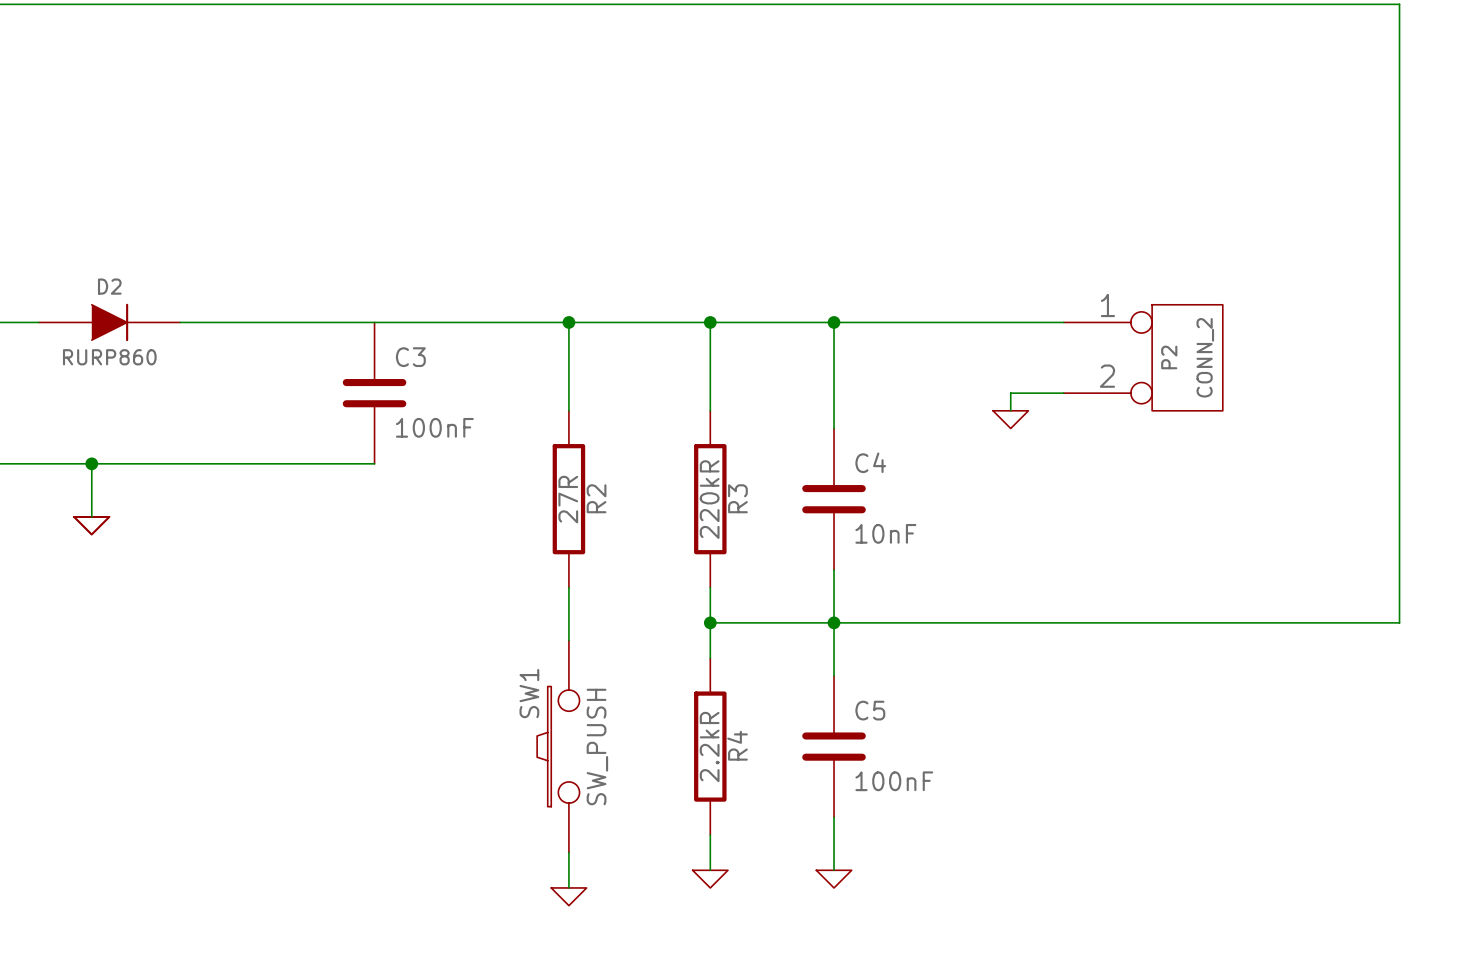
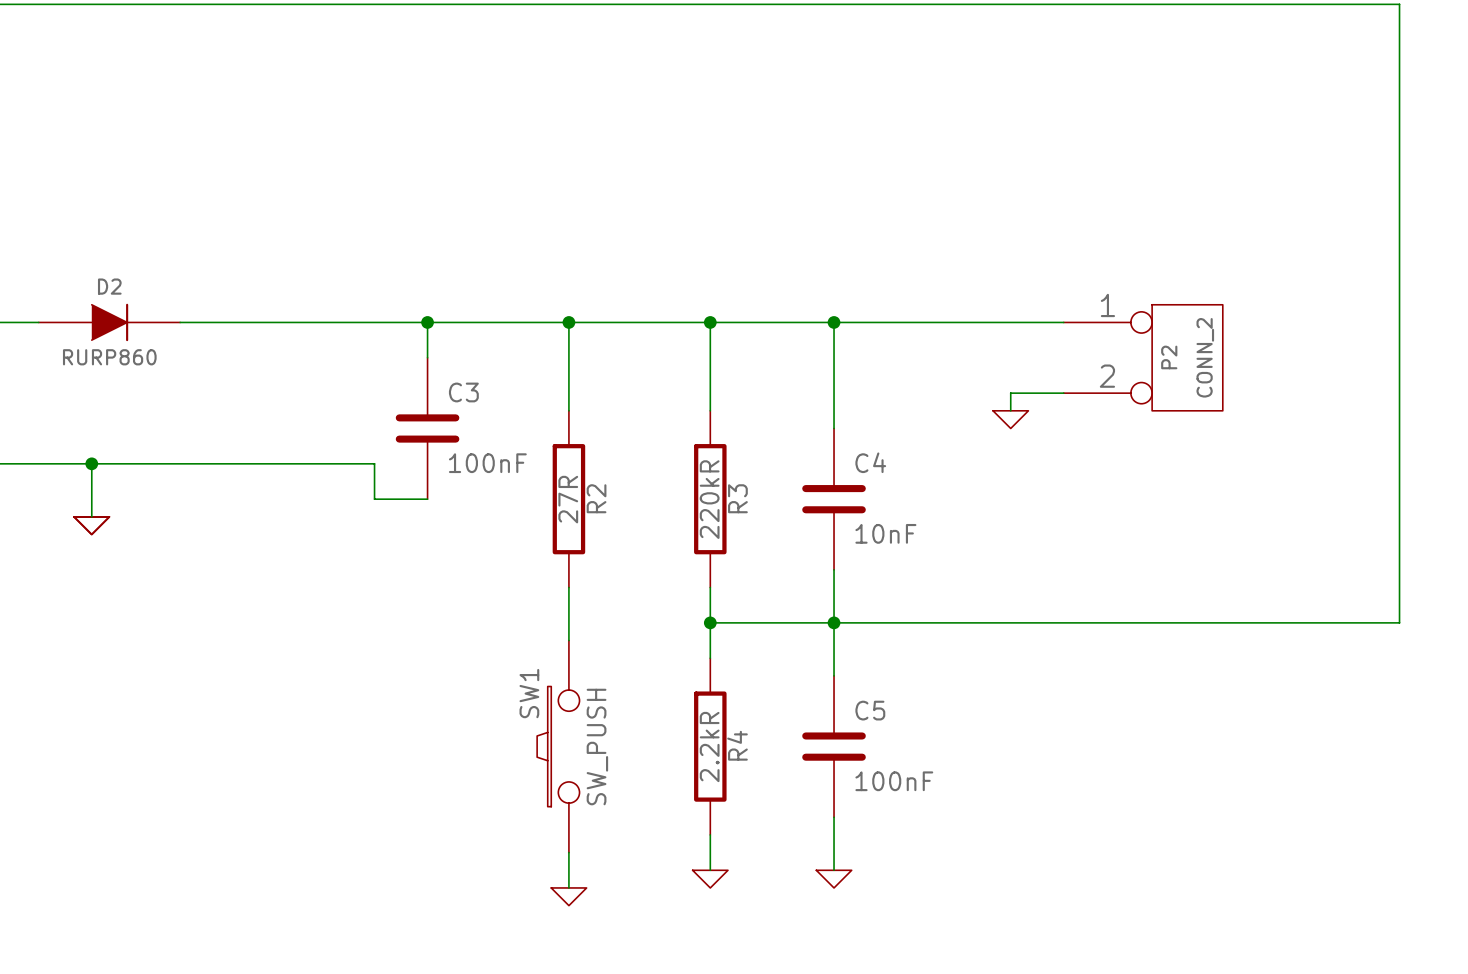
wire: none -> (427, 322) (427, 357)
junction: none -> (427, 322)
C3 position: (374, 393) -> (427, 428)
wire: none -> (374, 463) (374, 499) (427, 499)

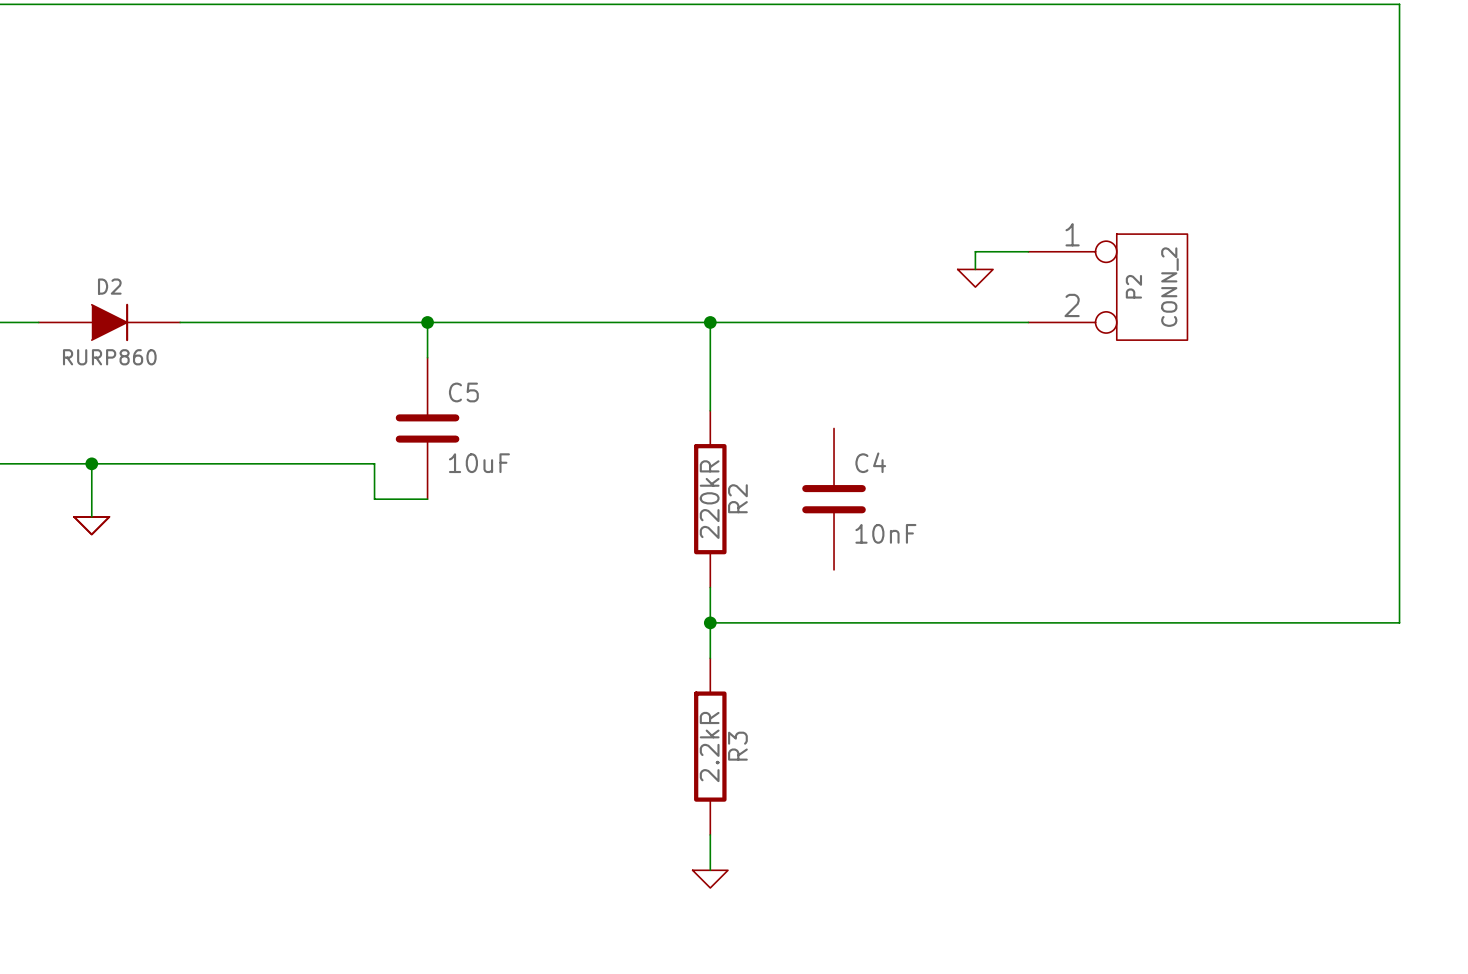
wire: (568, 322) (568, 410) -> none
junction: (568, 322) -> none
wire: (834, 322) (834, 428) -> none
junction: (834, 322) -> none
P2 position: (1143, 357) -> (1107, 287)
C3 name: C3 (463, 392) -> C5 (463, 392)
wire: (1063, 393) (1010, 393) (1010, 410) -> (1028, 251) (975, 251) (975, 269)
power symbol position: (1010, 419) -> (975, 278)
C3 value: 100nF (487, 463) -> 10uF (479, 463)
R3 name: R3 (737, 498) -> R2 (737, 498)
R2: 27R (568, 499) -> none
wire: (834, 569) (834, 675) -> none
wire: (568, 587) (568, 640) -> none
junction: (834, 622) -> none
R4 name: R4 (737, 745) -> R3 (737, 746)
SW1: SW_PUSH (558, 746) -> none
C5: 100nF (834, 746) -> none
wire: (834, 817) (834, 870) -> none
wire: (568, 852) (568, 887) -> none
power symbol: (834, 879) -> none
power symbol: (568, 896) -> none

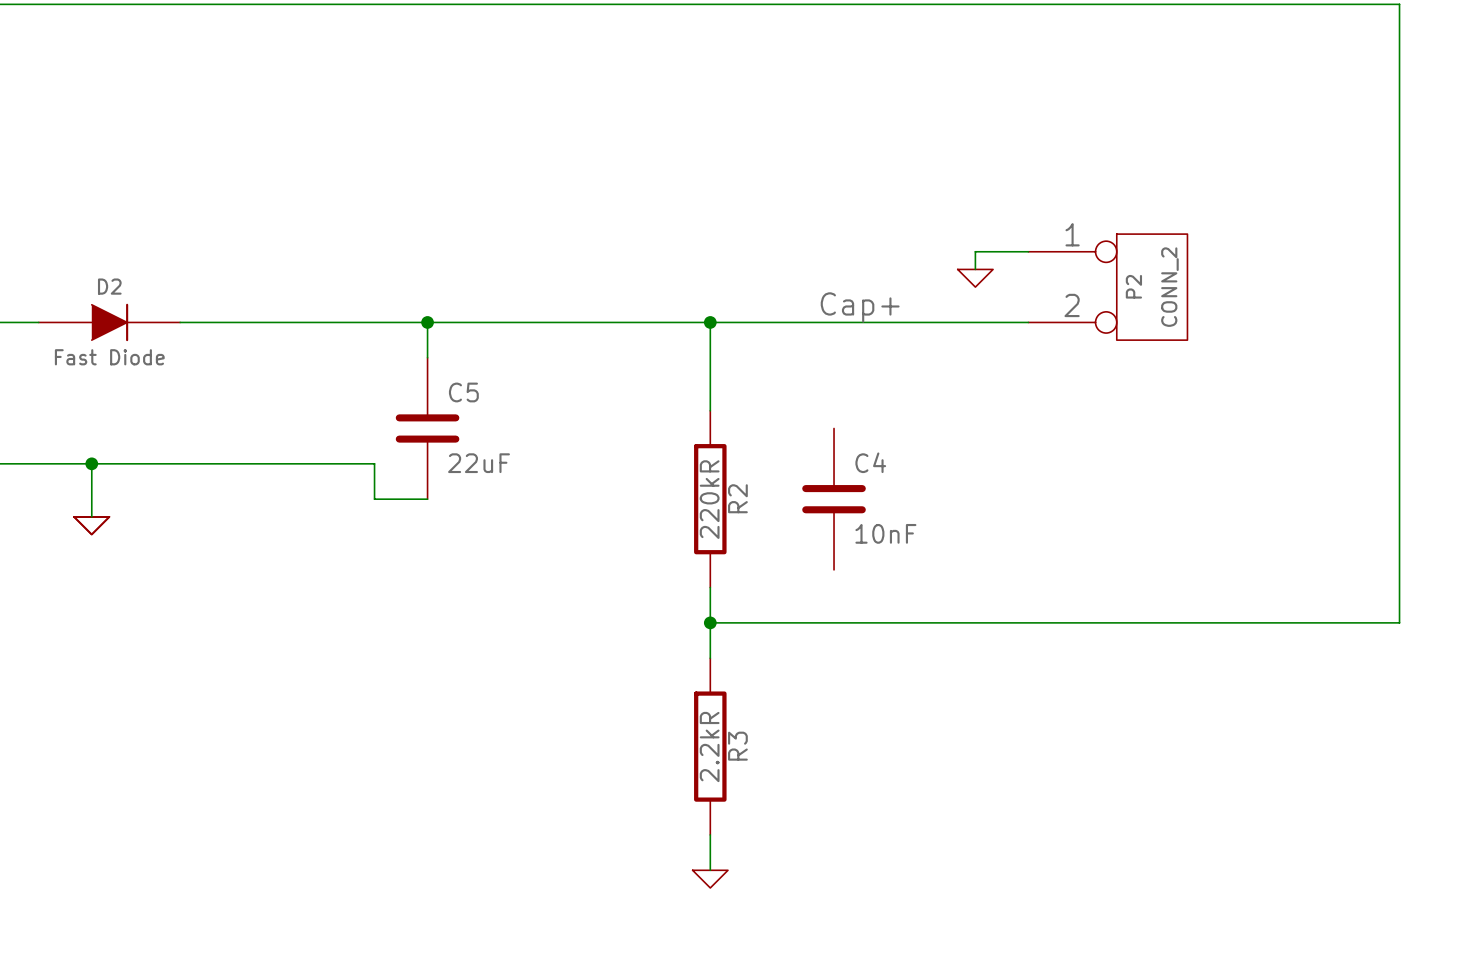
label: none -> Cap+ (860, 307)
D2 value: RURP860 (109, 357) -> Fast Diode (109, 357)
C5 value: 10uF (479, 463) -> 22uF (479, 463)

